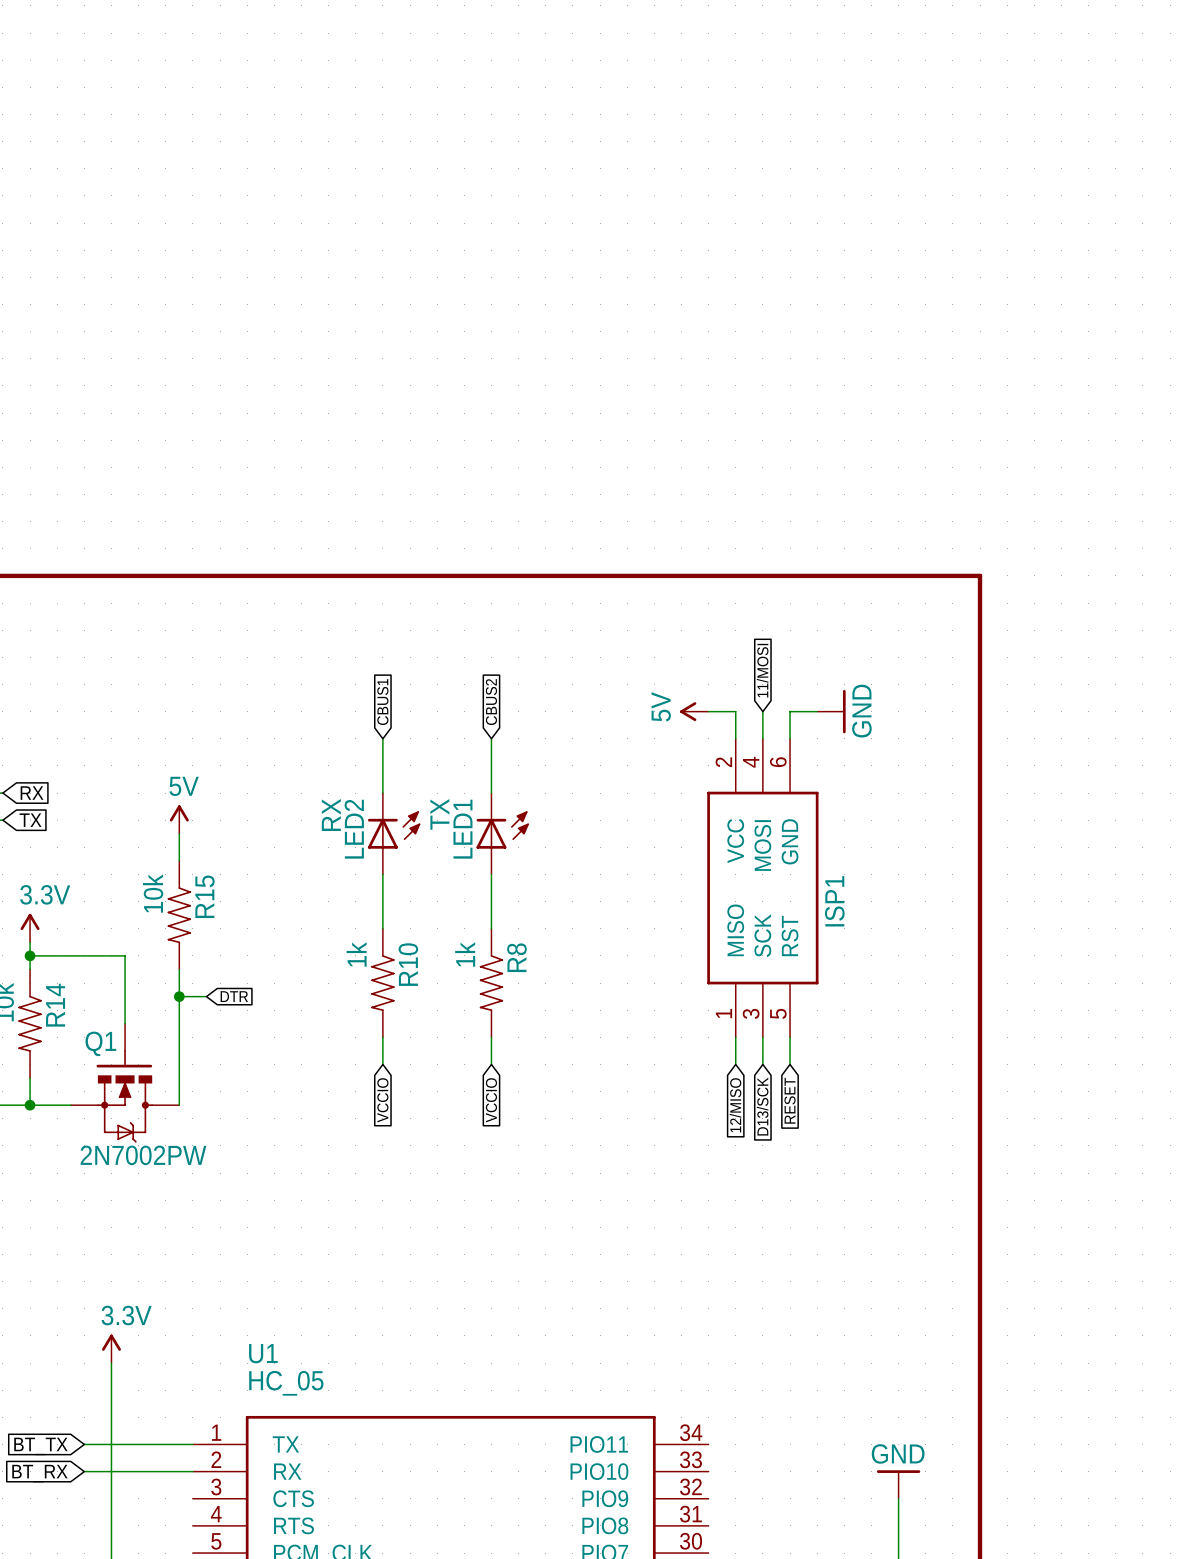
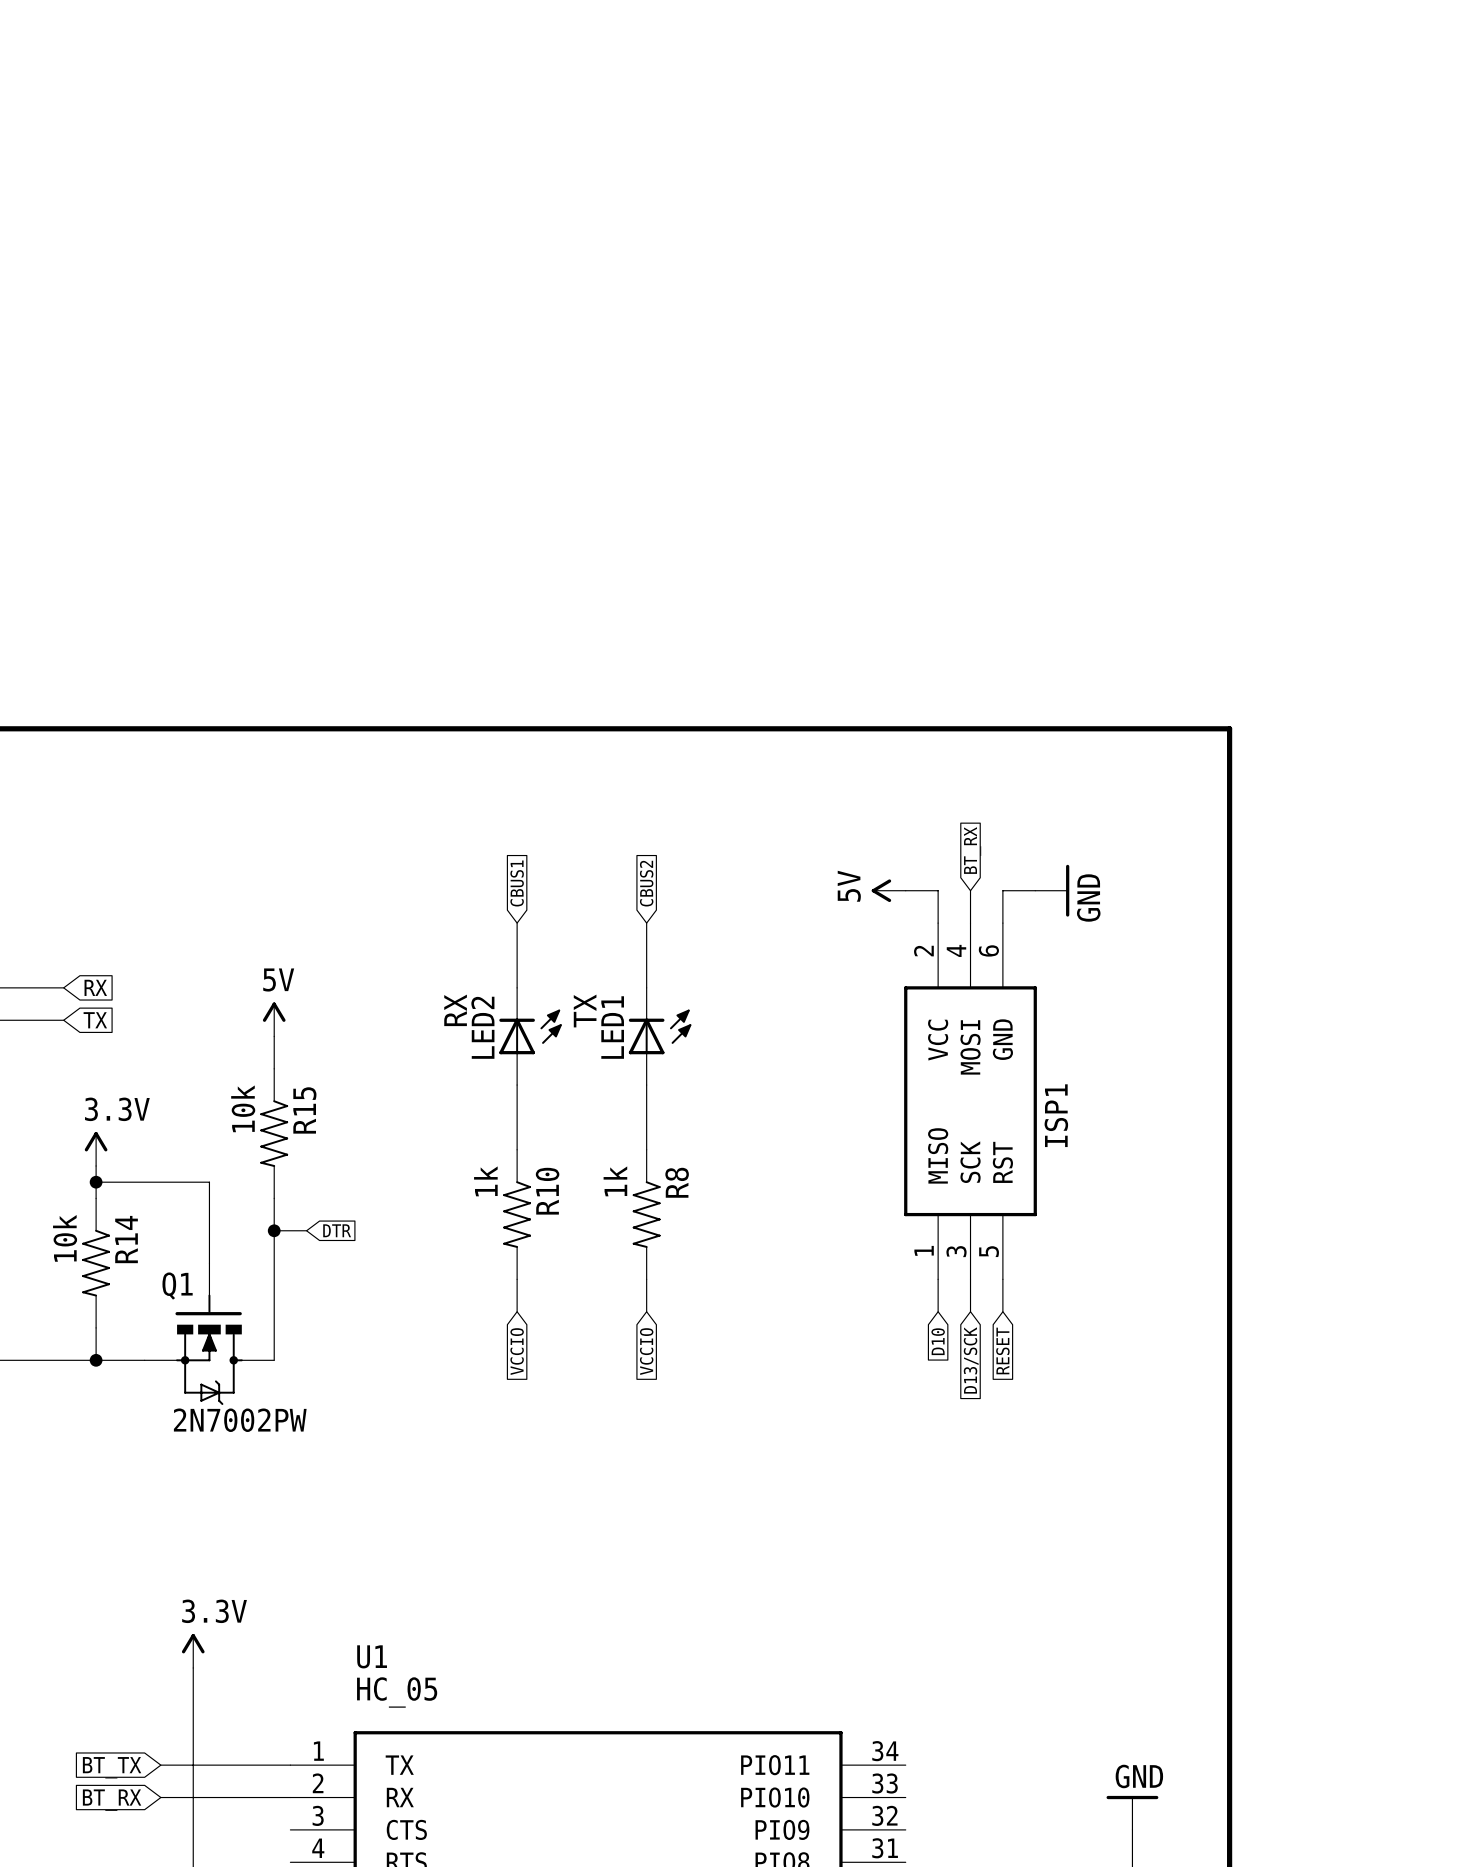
global label: 11/MOSI (762, 670) -> BT_RX (972, 850)
global label: 12/MISO (735, 1105) -> D10 (938, 1341)

